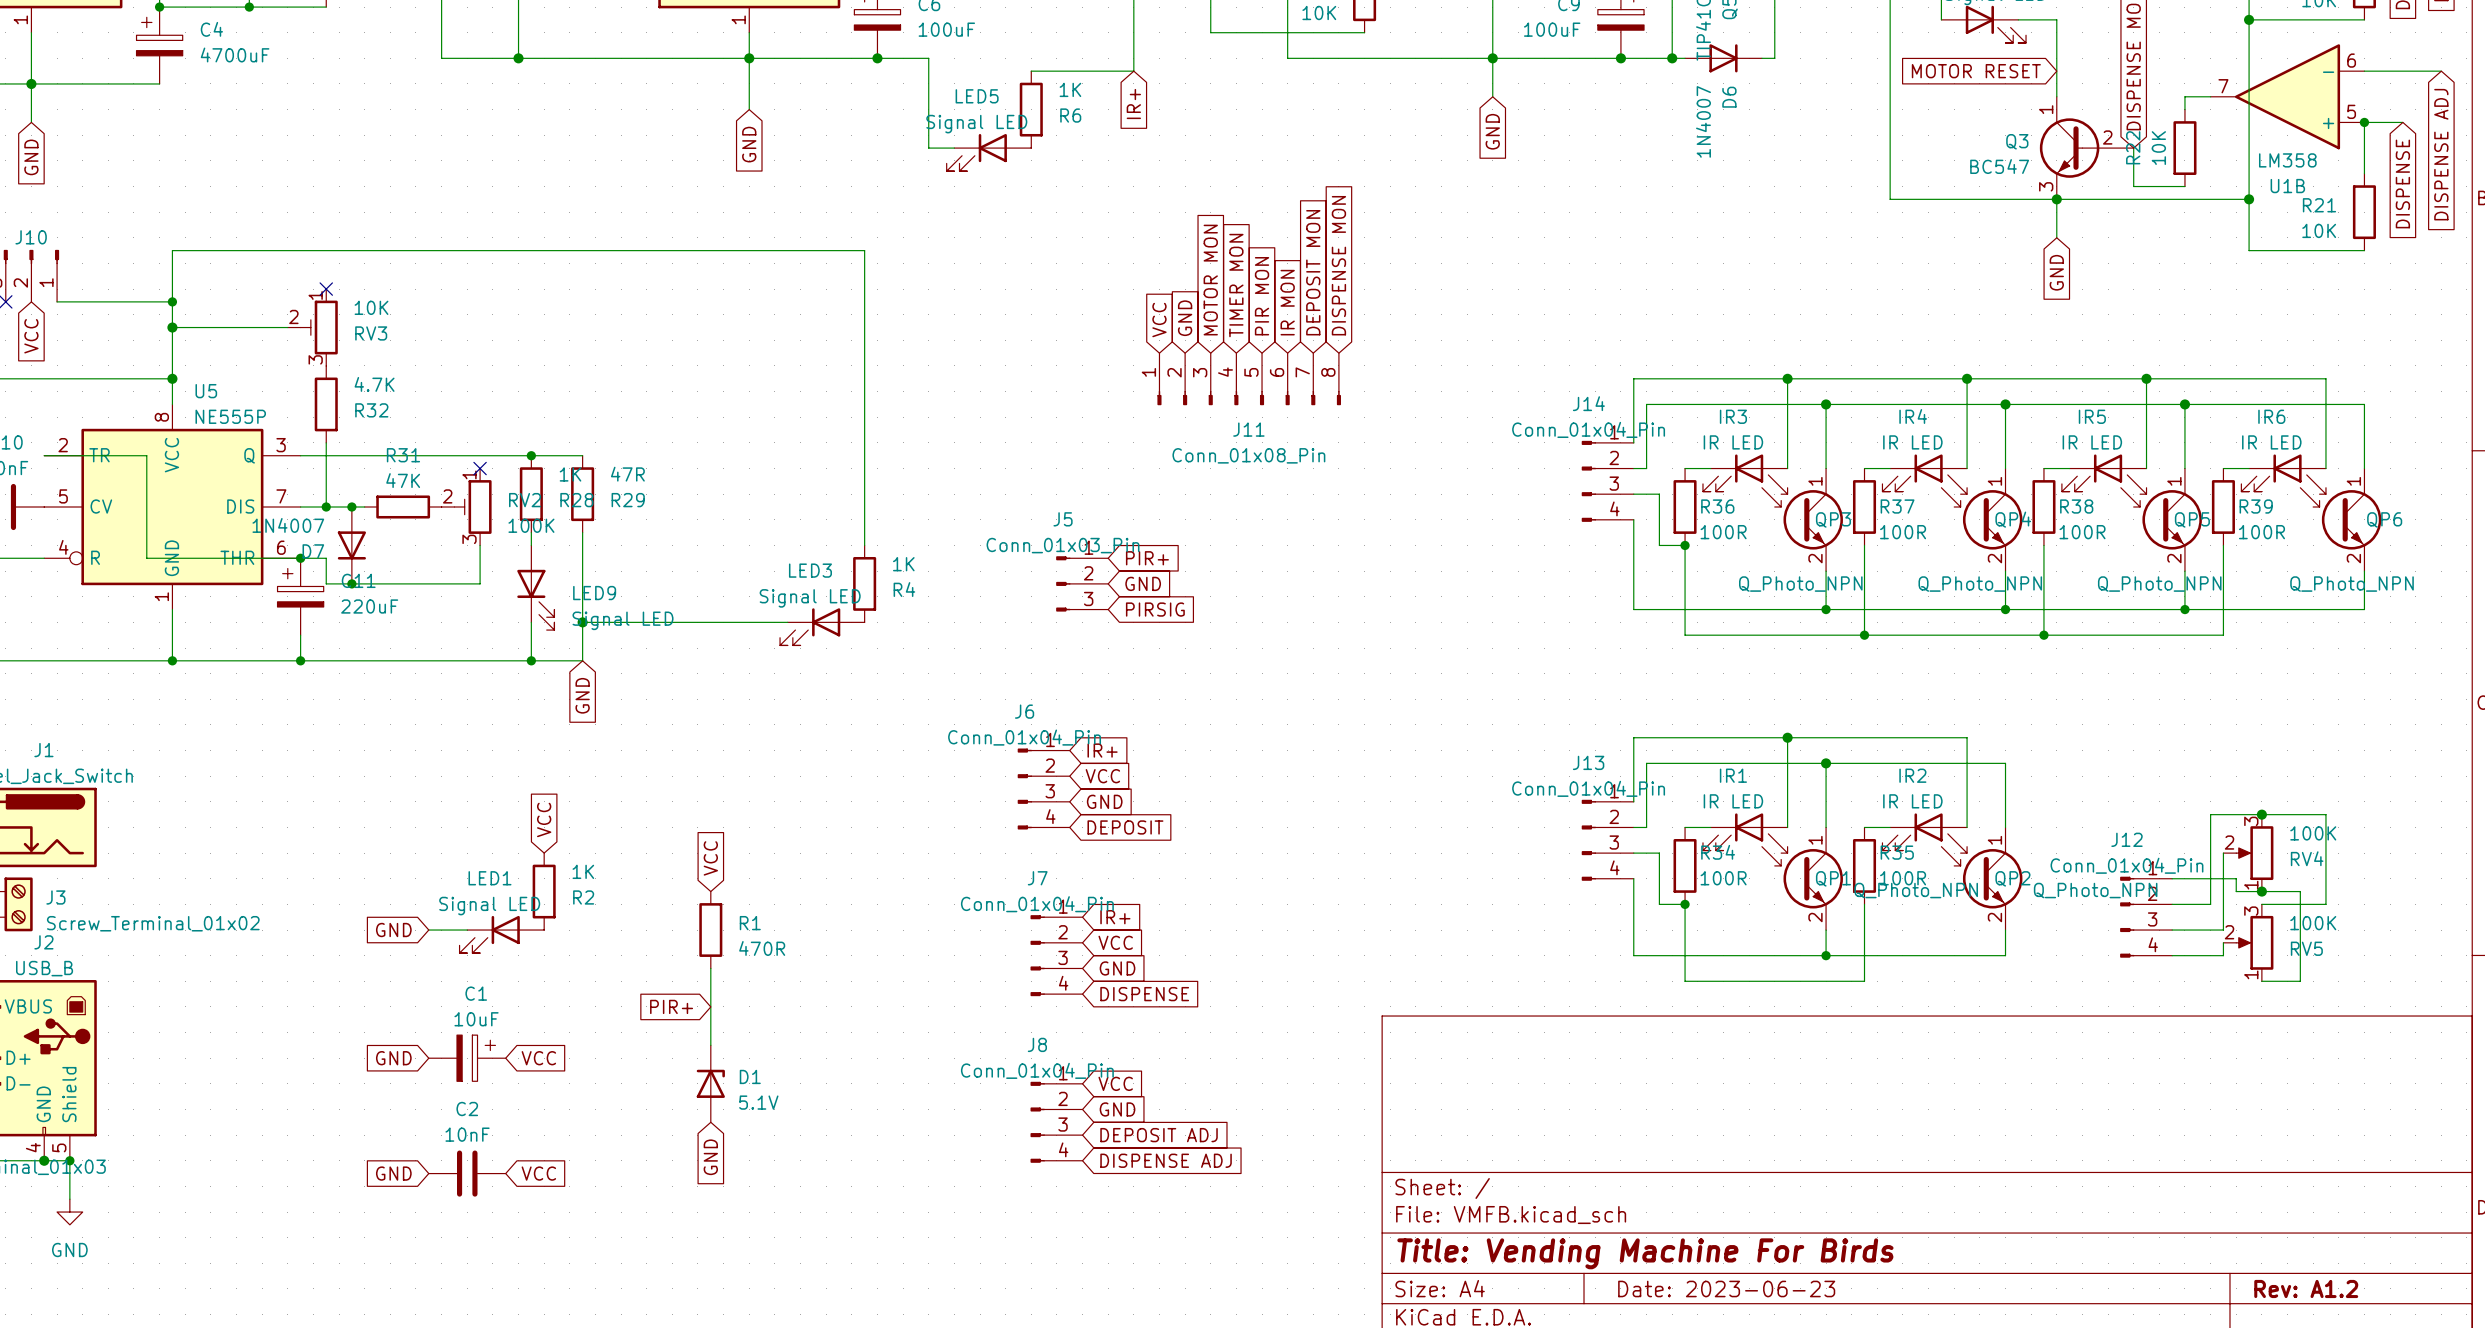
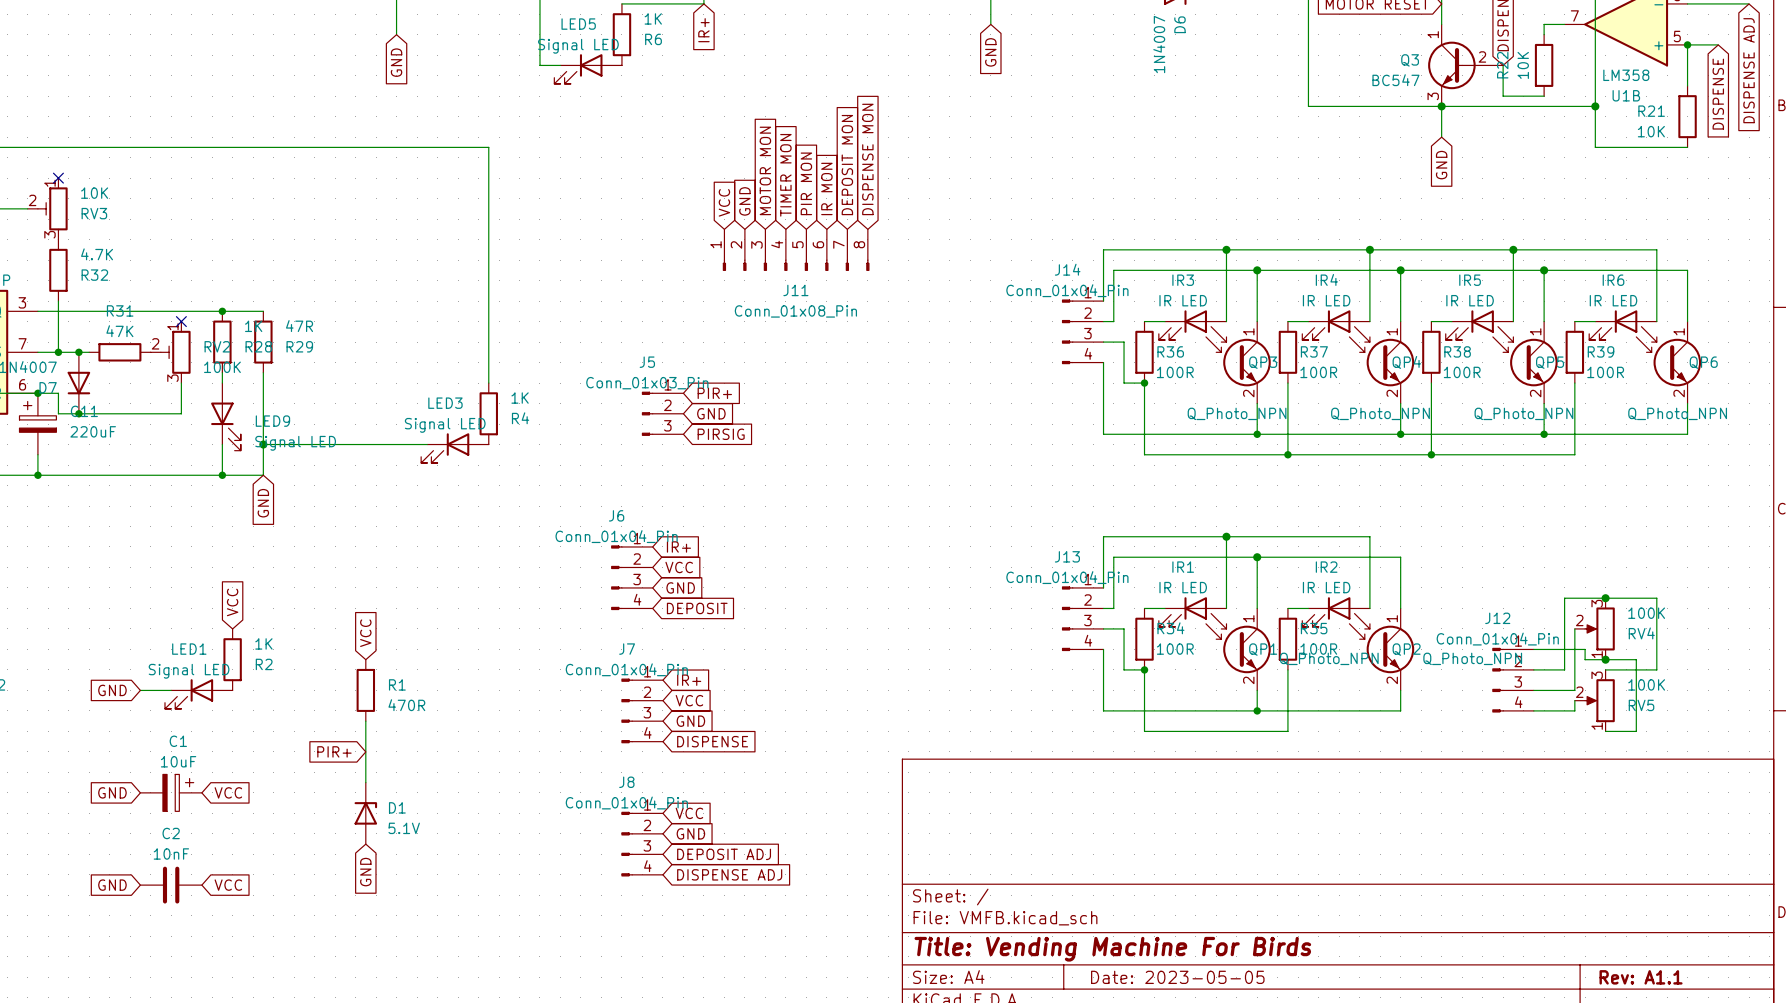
title block: Date: 2023-06-23 (1726, 1288) -> Date: 2023-05-05 (1177, 977)
title block: Rev: A1.2 (2306, 1288) -> Rev: A1.1 (1641, 977)

